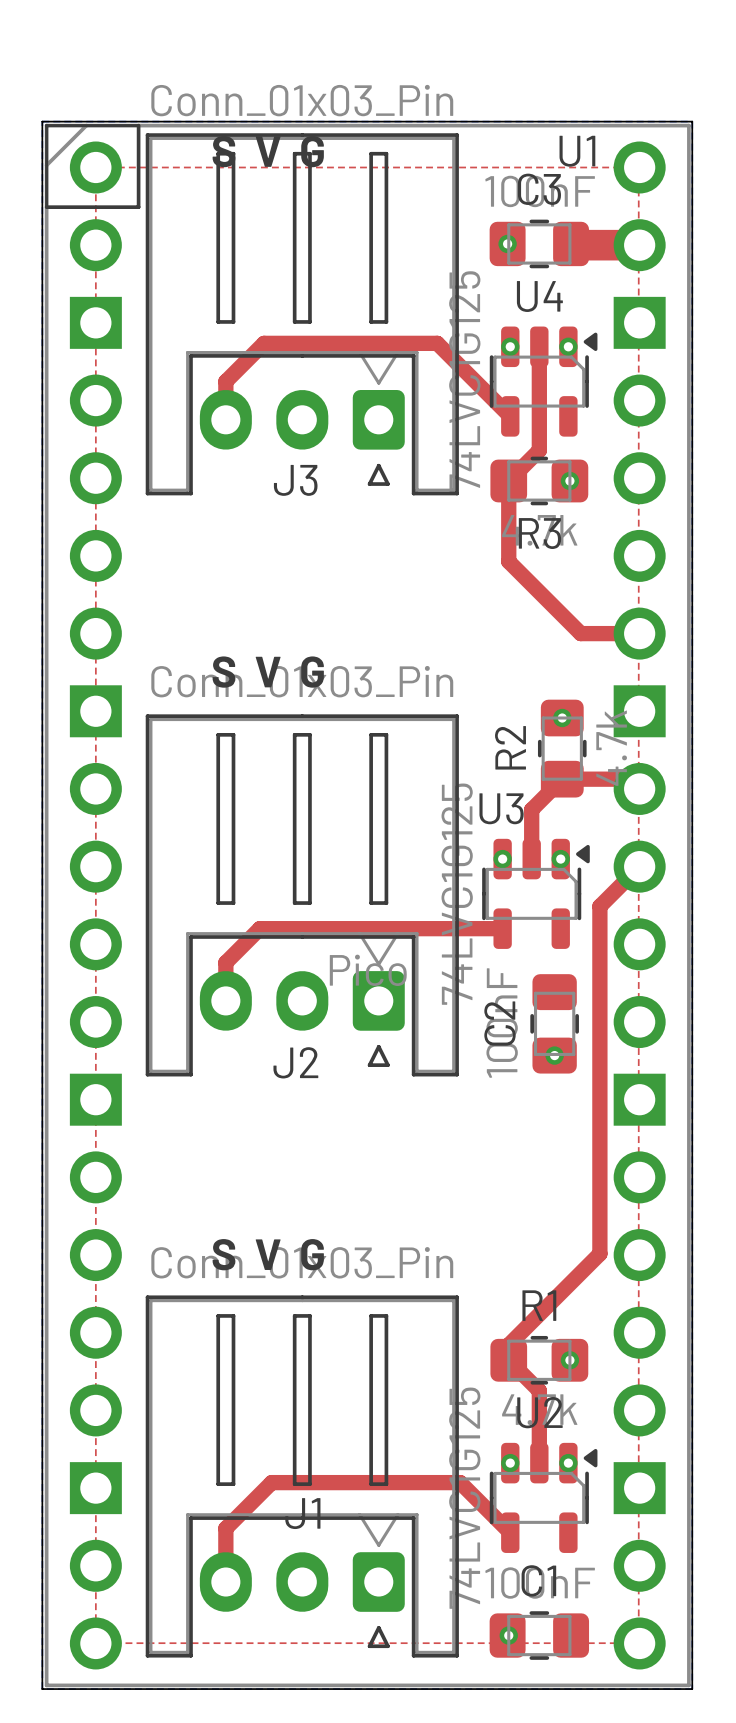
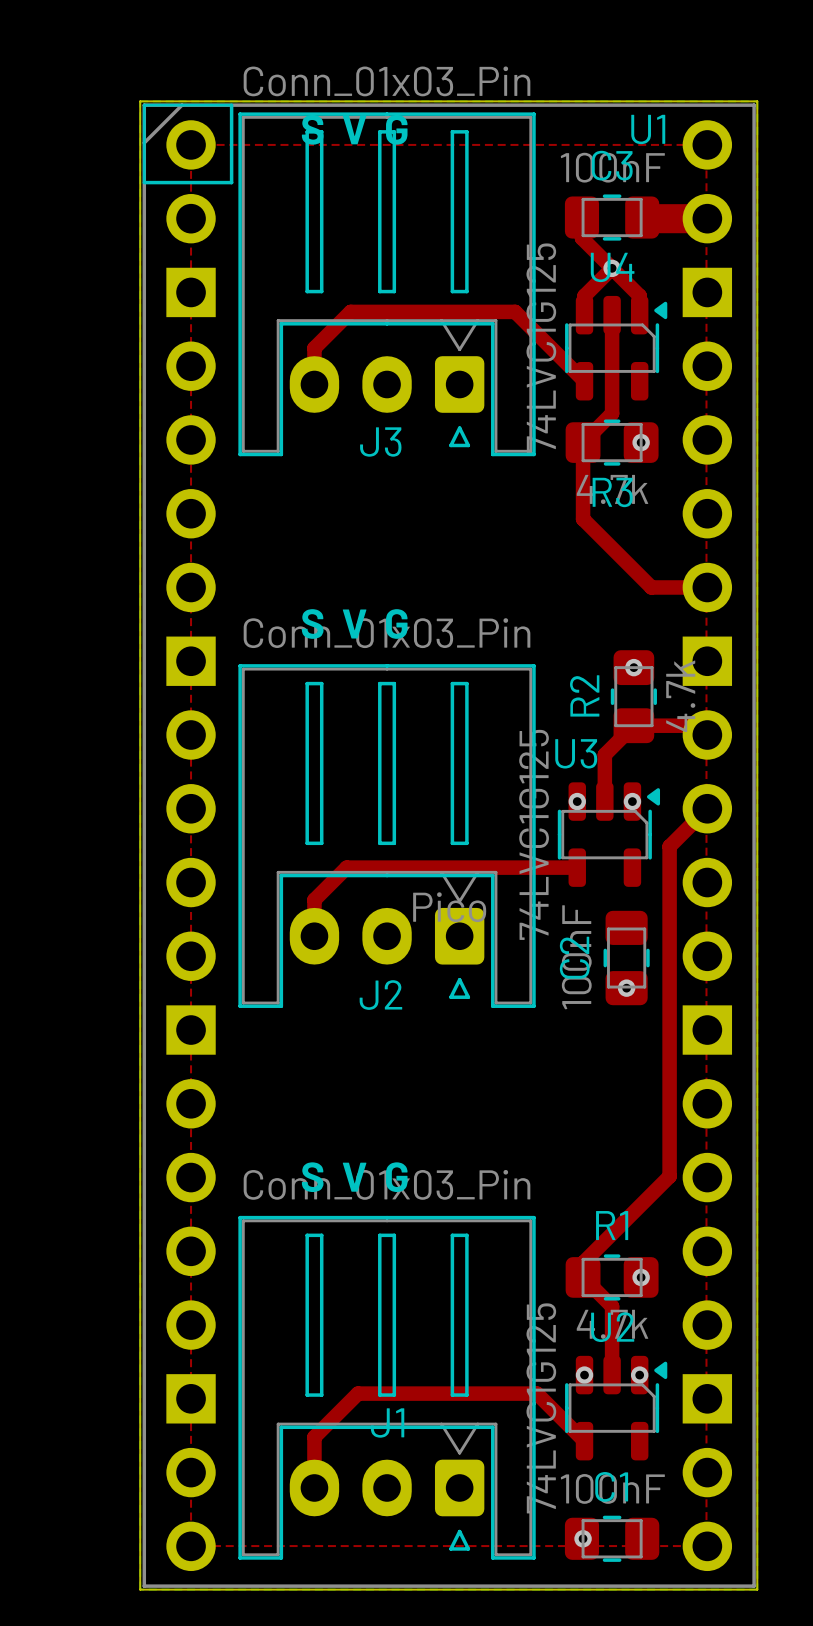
top track: none -> (581, 217) (581, 238) (639, 295) (639, 315)
via: (507, 243) -> none
top track: none -> (612, 268) (584, 295) (584, 315)
via: none -> (612, 268)
via: (510, 346) -> none
via: (568, 346) -> none

